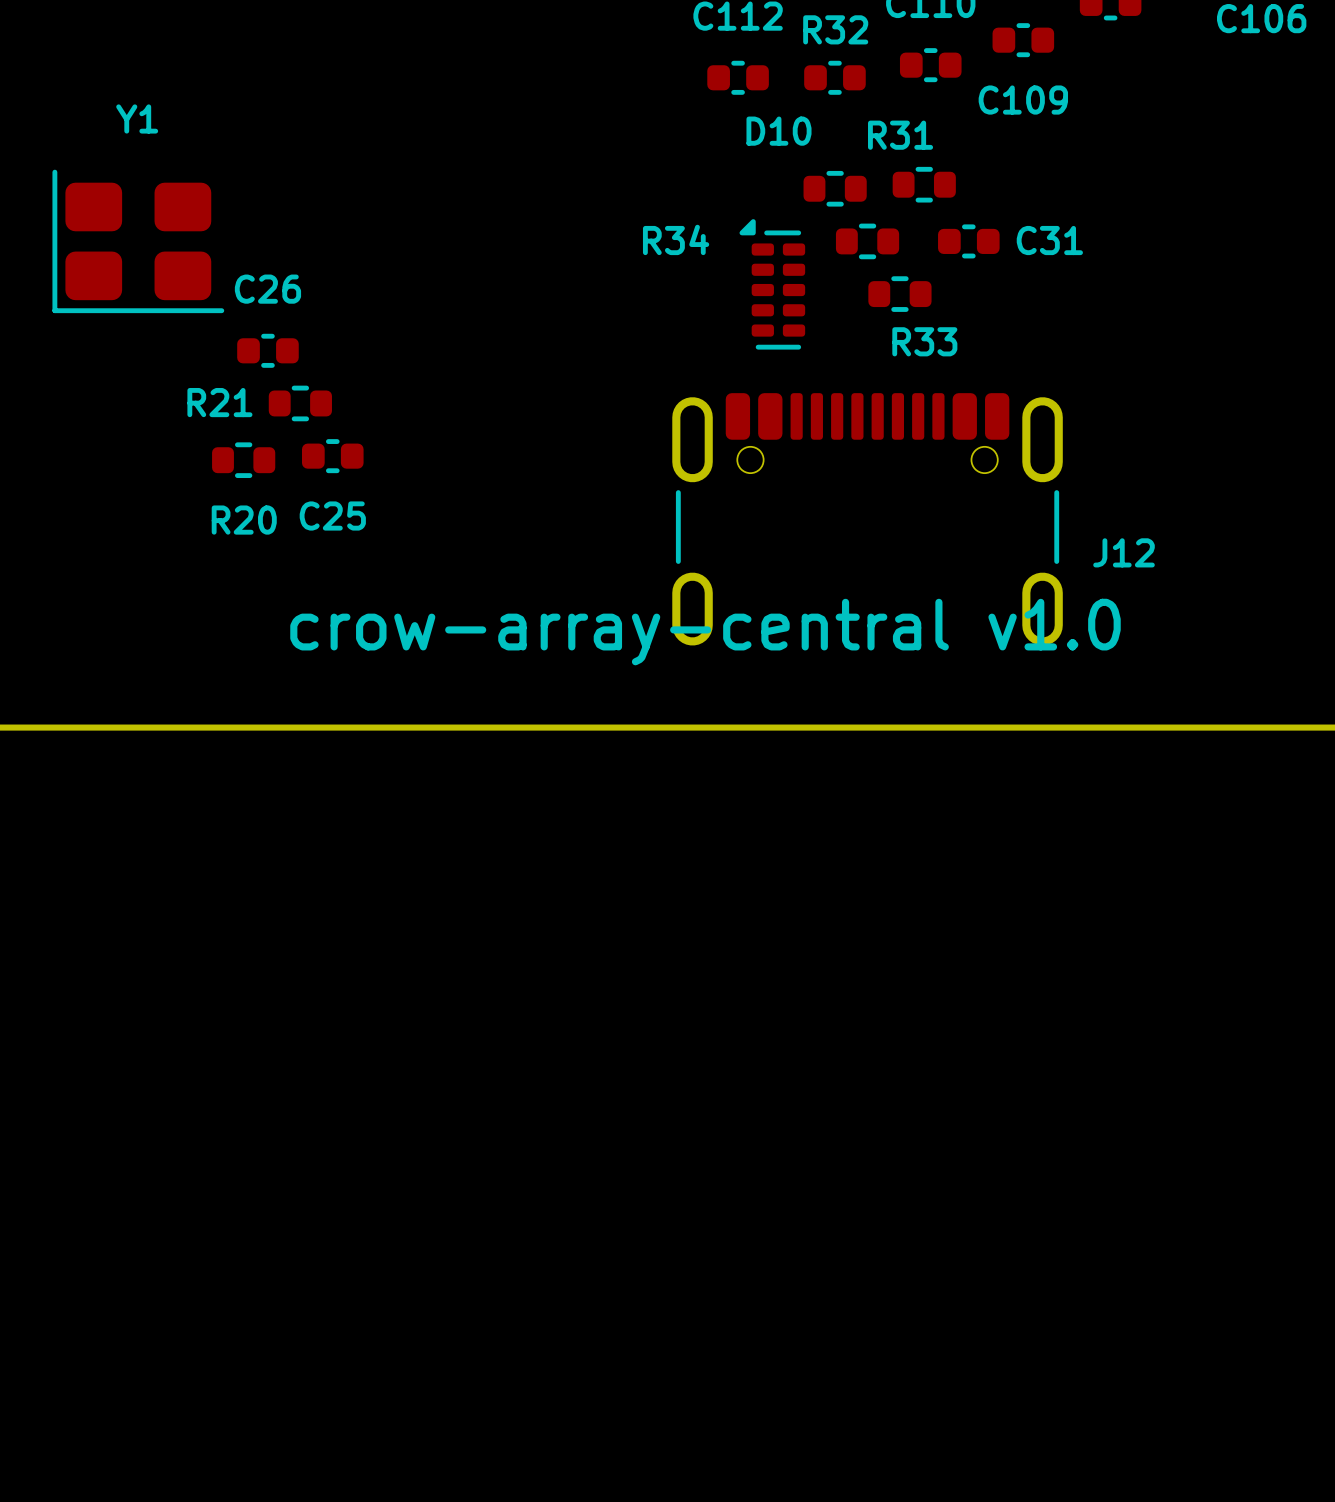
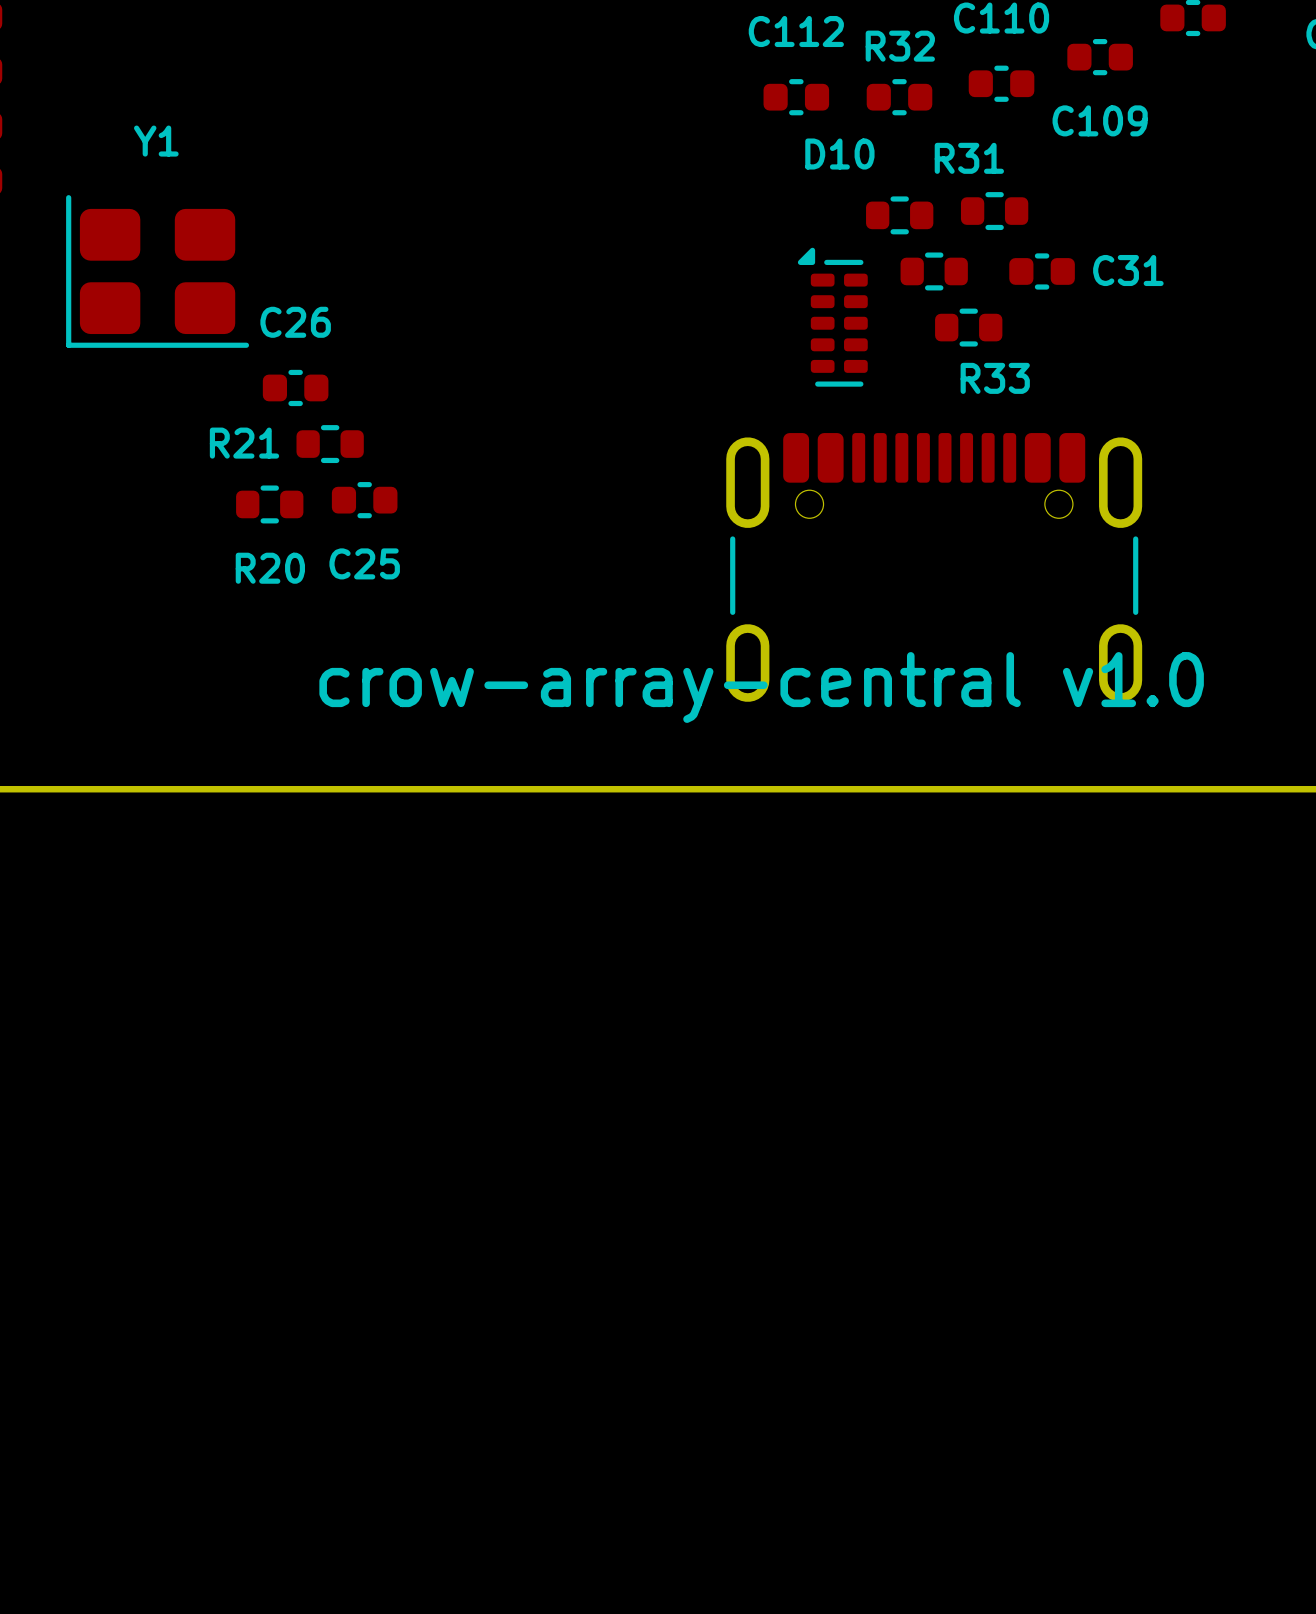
R34 name: R34 (676, 239) -> none
J12 name: J12 (1124, 552) -> none

